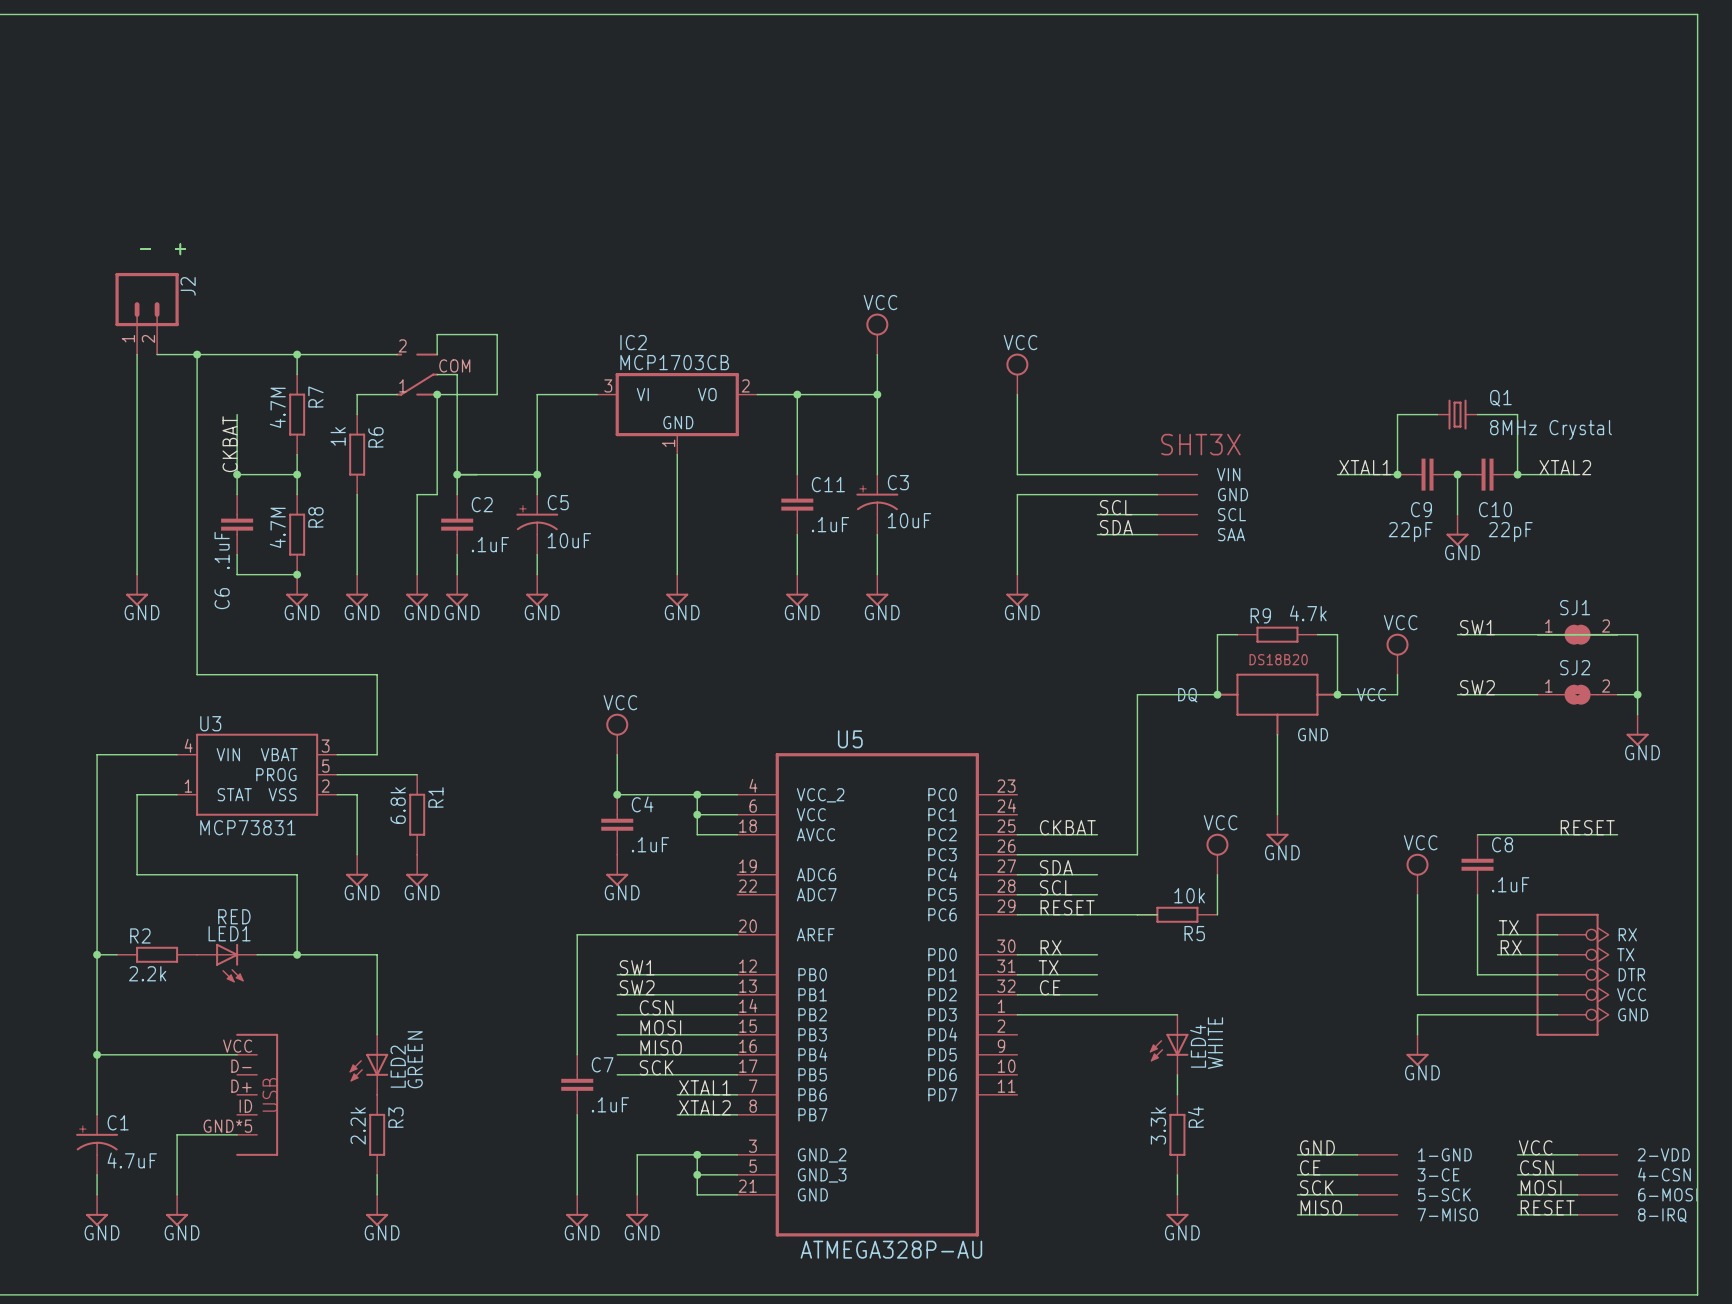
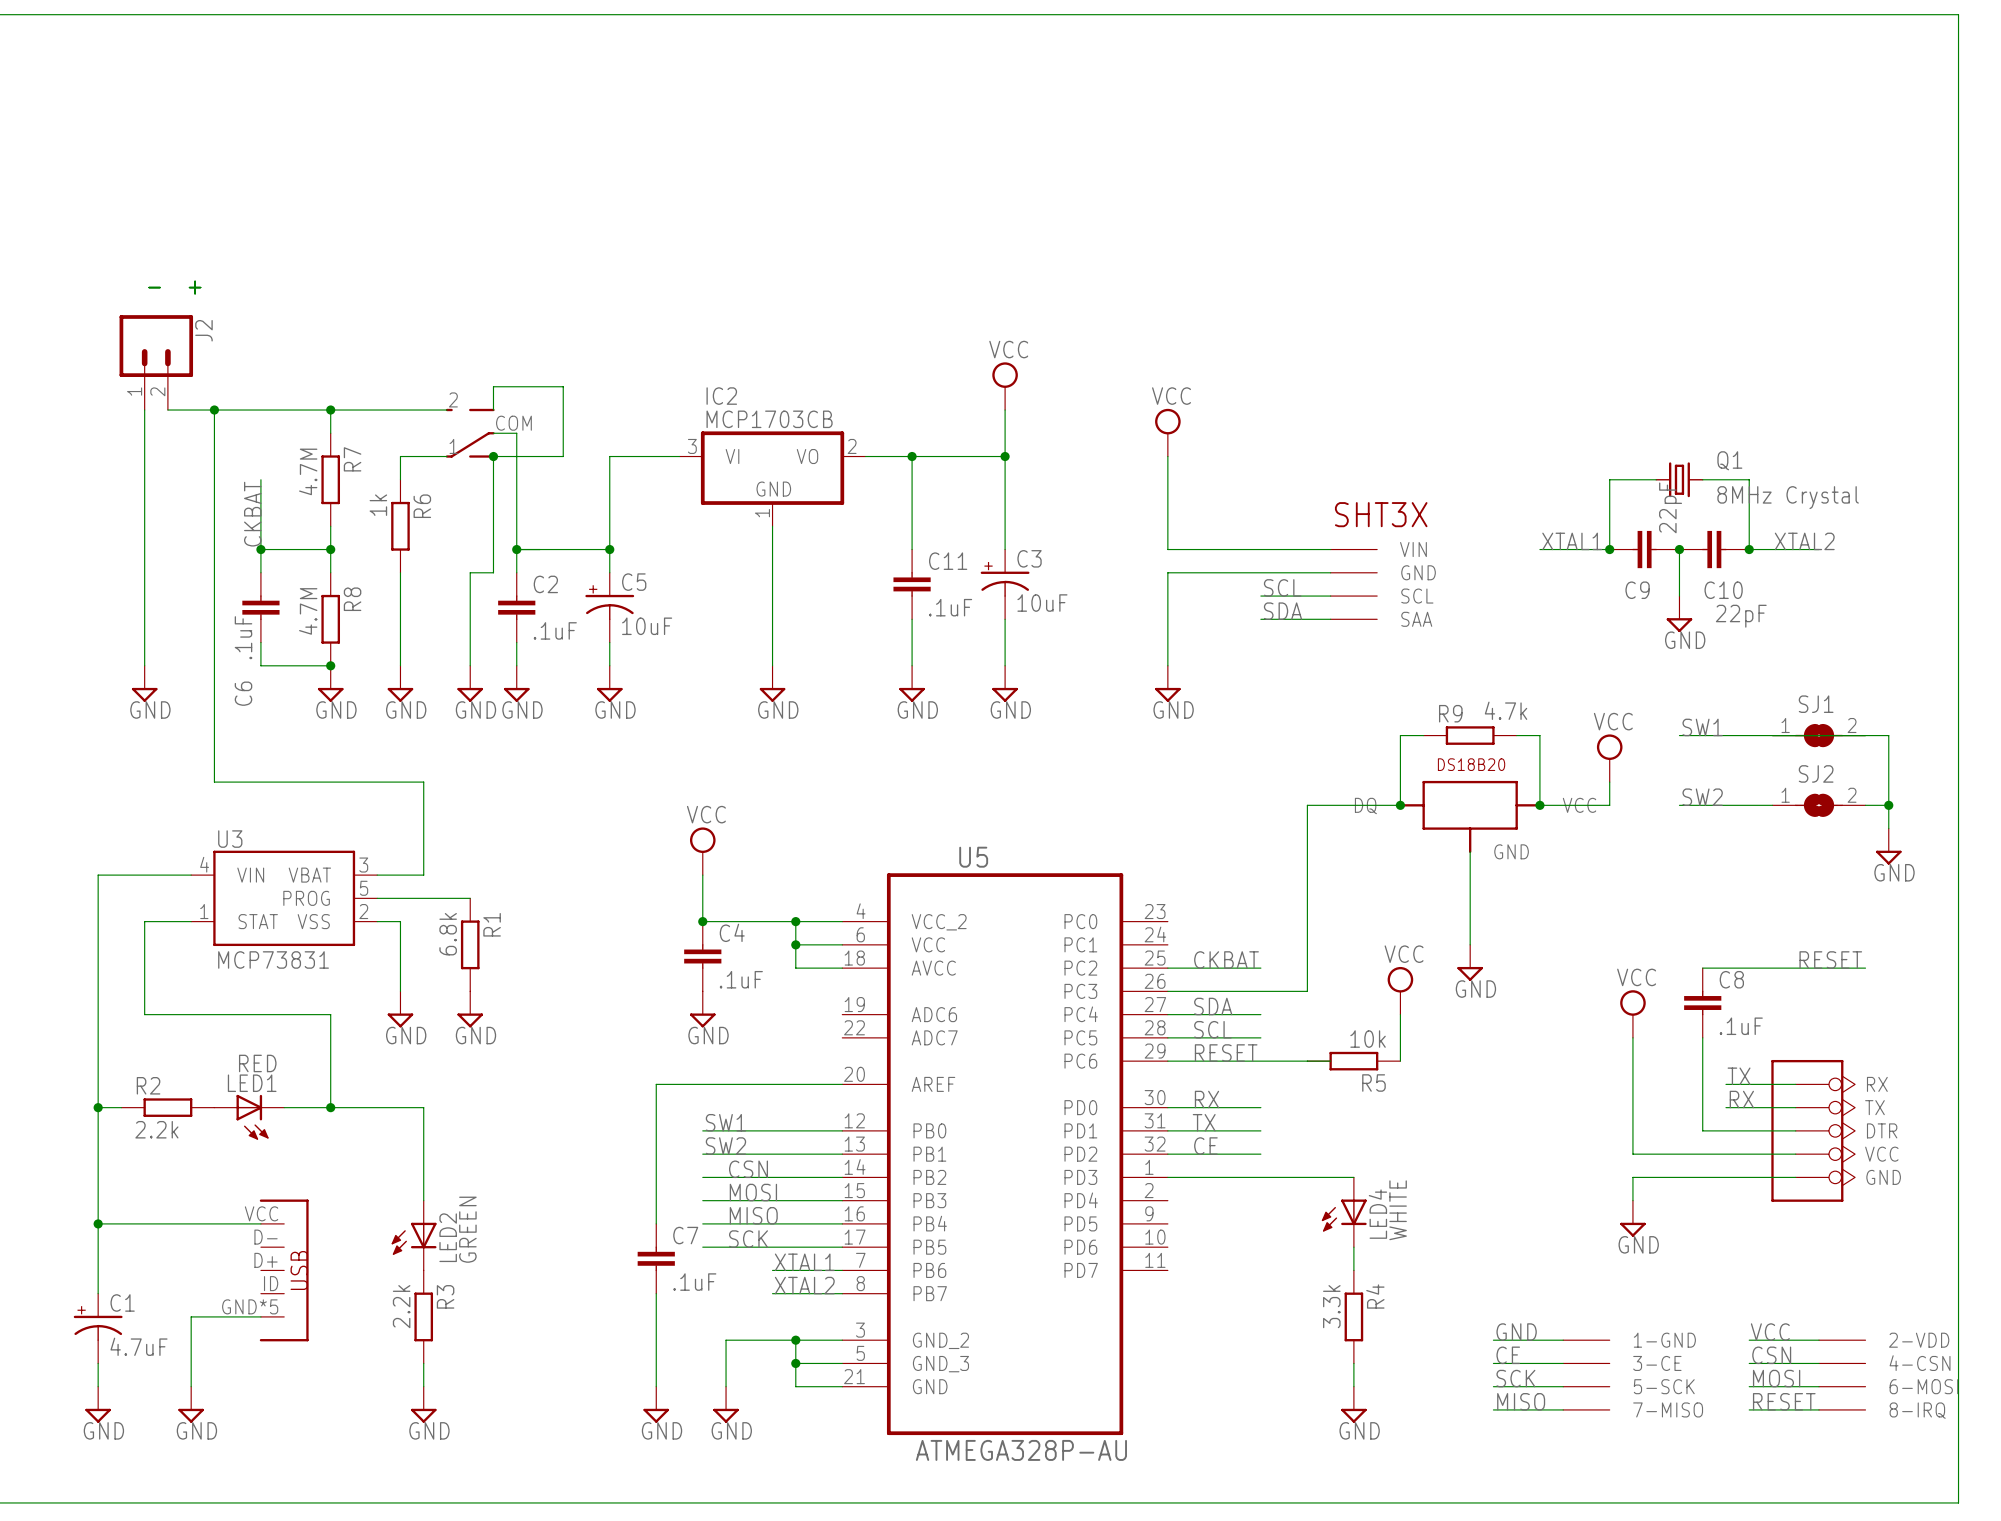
C9 value rotation: 0° (1410, 531) -> 90° counterclockwise (1670, 507)
C9 value position: 22pF (1410, 531) -> 22pF (1670, 507)

